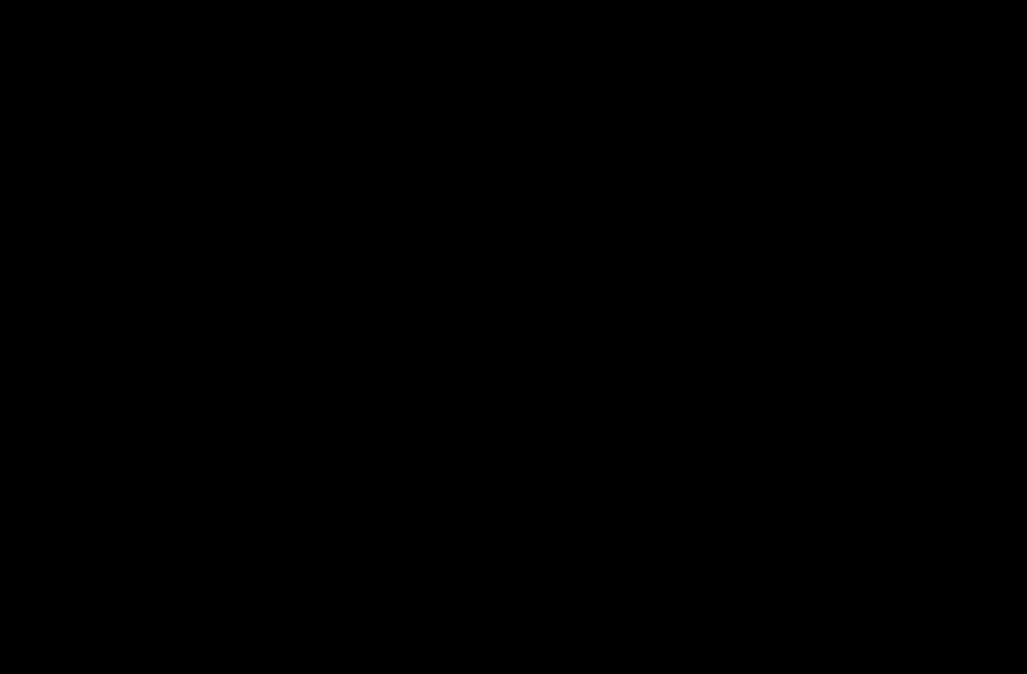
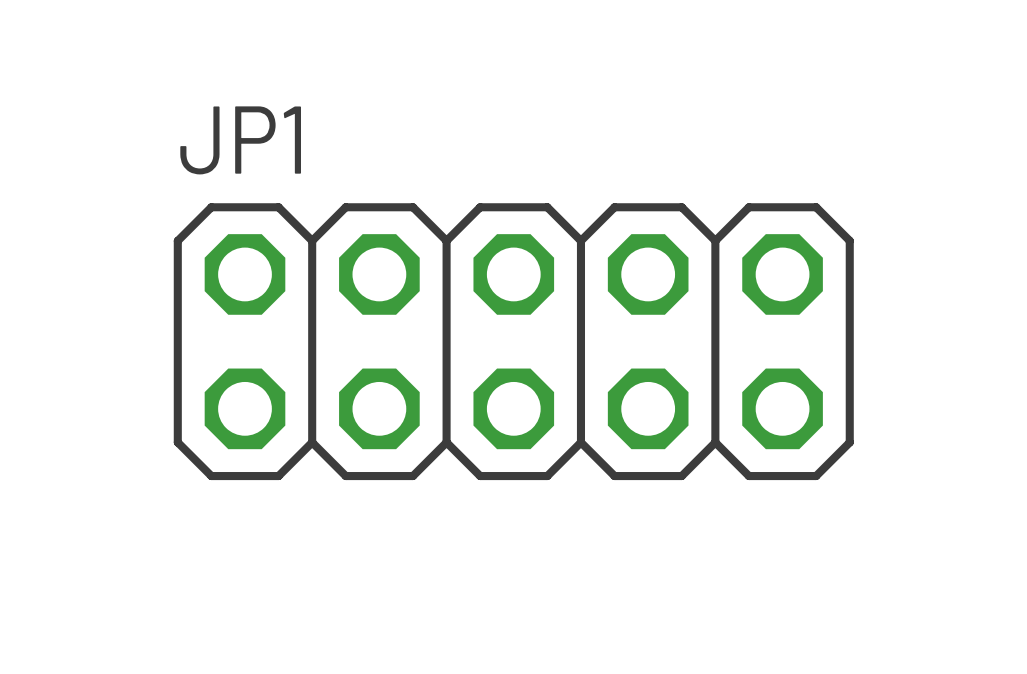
JP1: none -> (513, 341)

